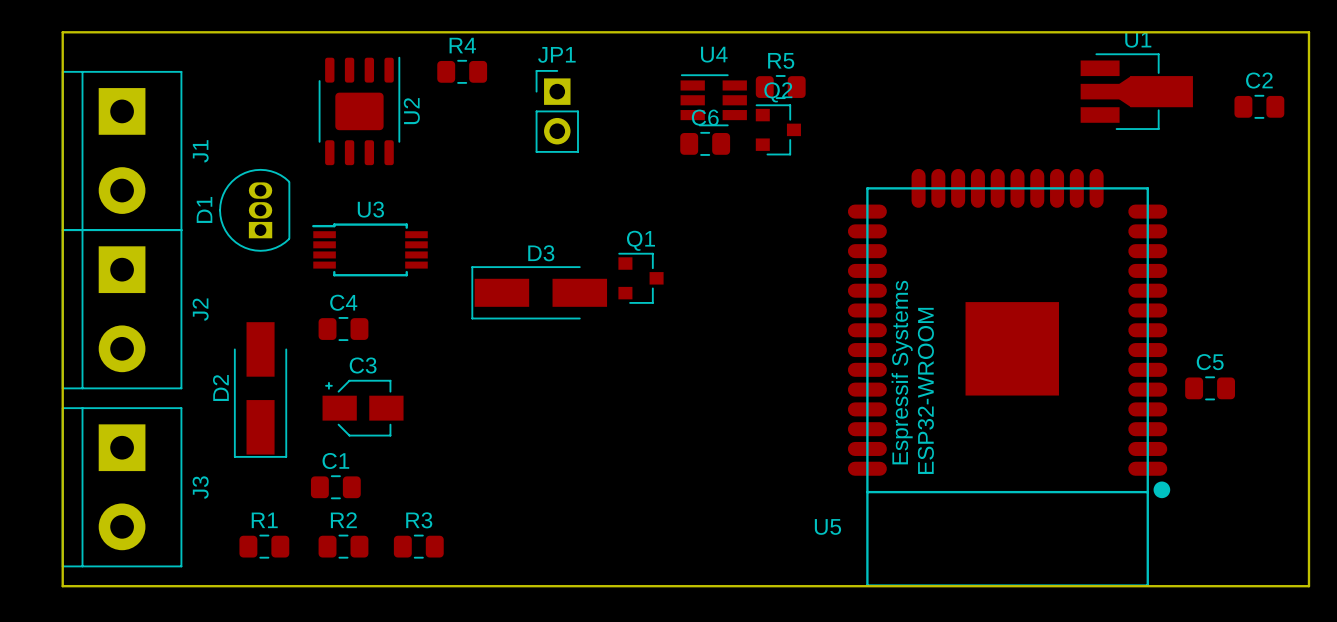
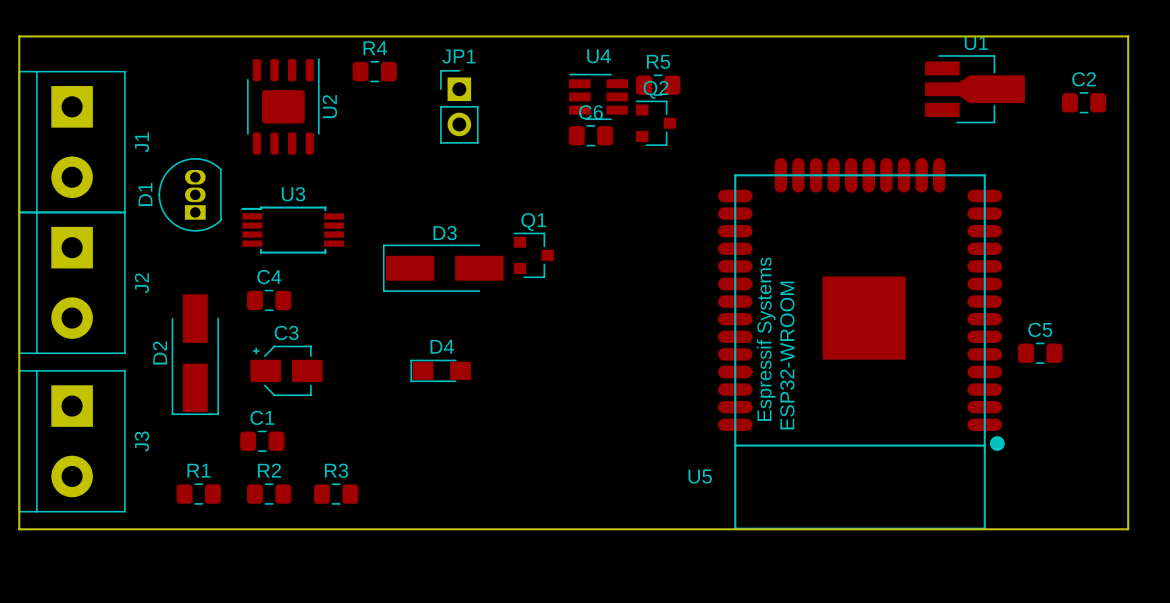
D4: none -> (440, 370)

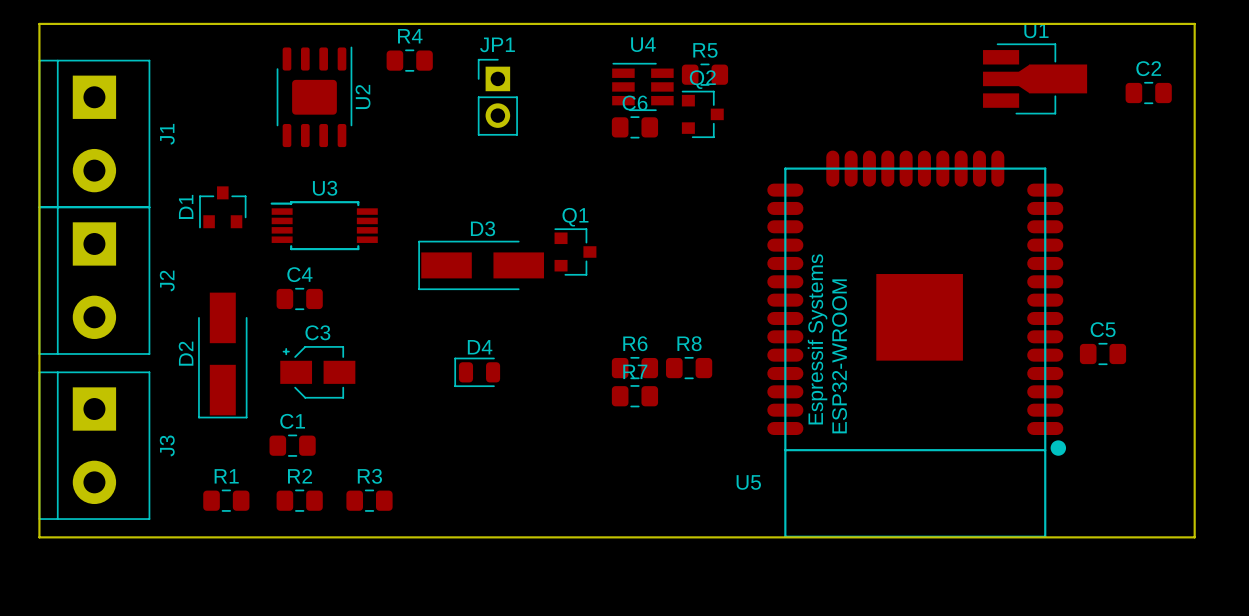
D1 footprint: [158, 157, 222, 232] -> [199, 186, 247, 229]
D4 footprint: [410, 359, 471, 383] -> [454, 357, 501, 388]
R6: none -> (634, 368)
R8: none -> (689, 368)
R7: none -> (634, 396)

